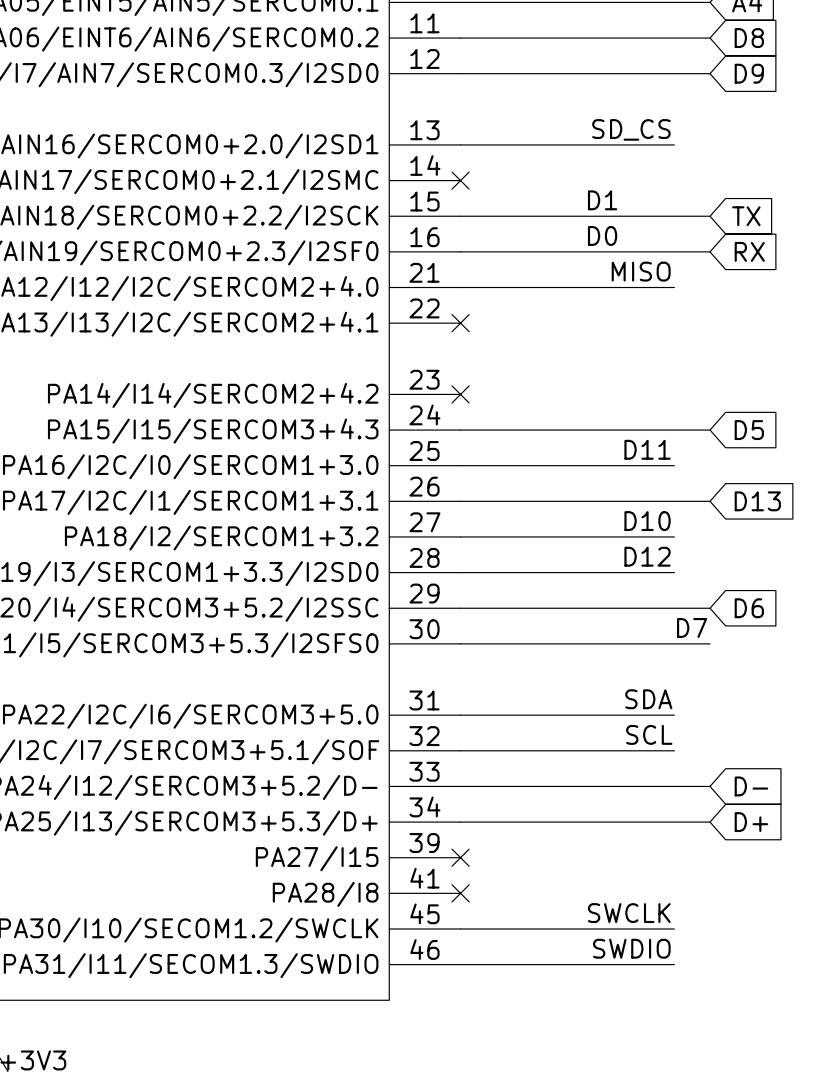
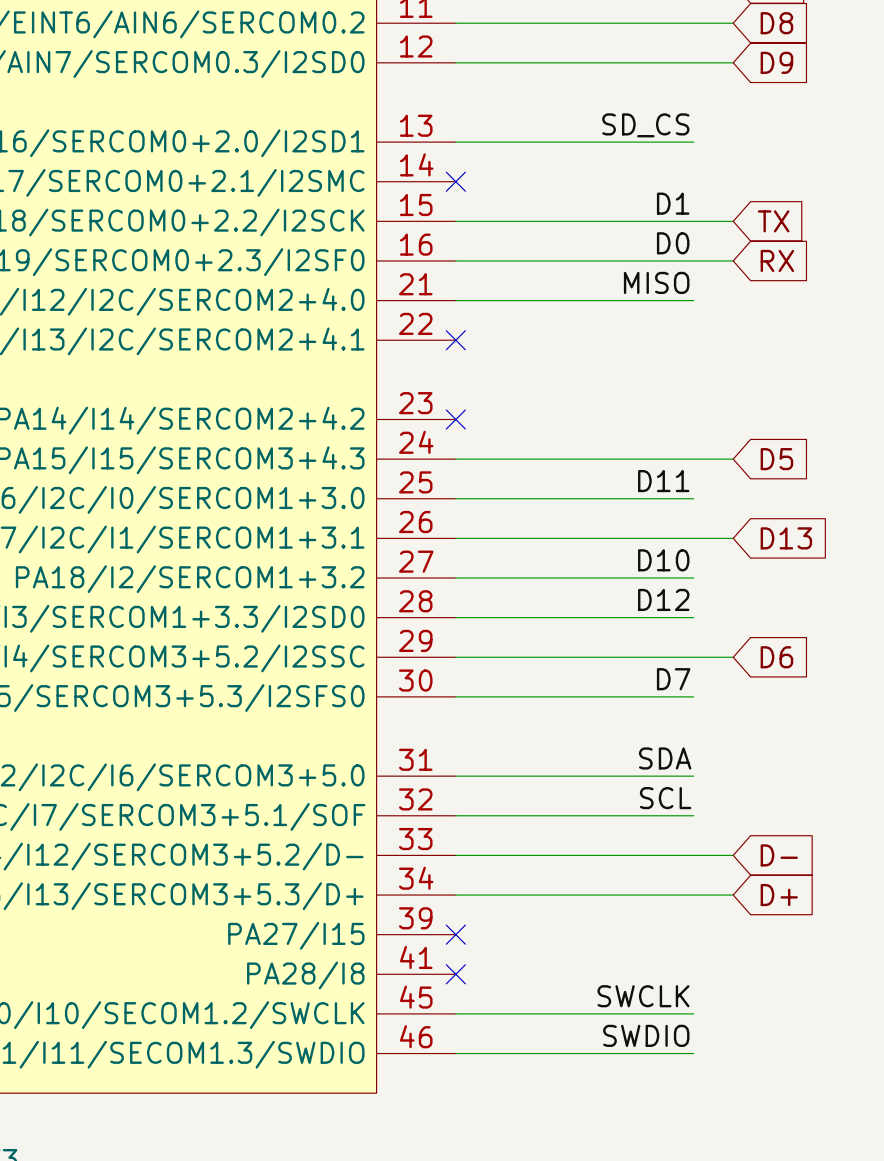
label position: D1 (602, 200) -> D1 (673, 203)
label position: D0 (602, 235) -> D0 (673, 243)
label position: D7 (692, 627) -> D7 (673, 679)
wire: (674, 643) (710, 643) -> none

